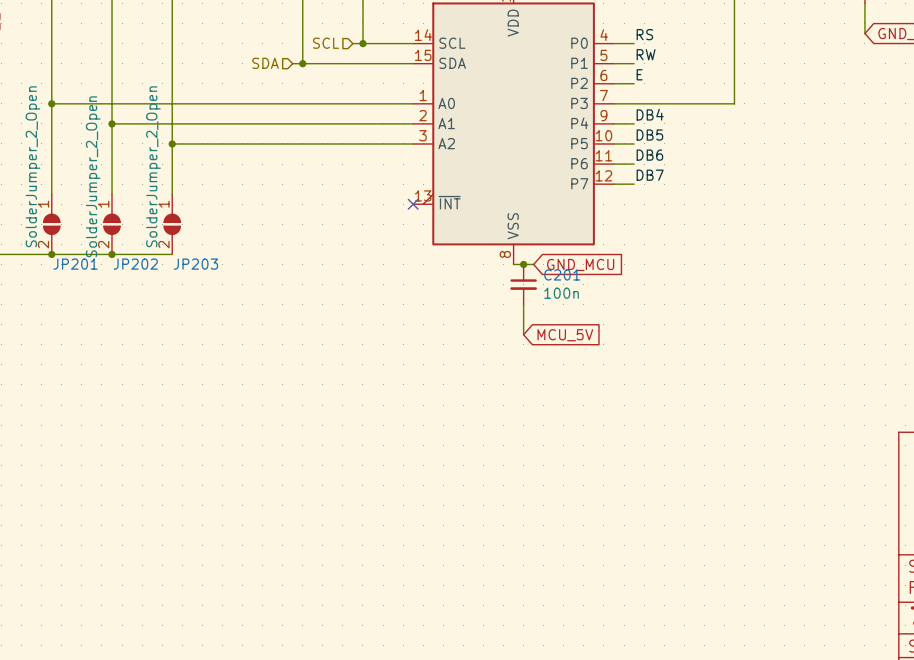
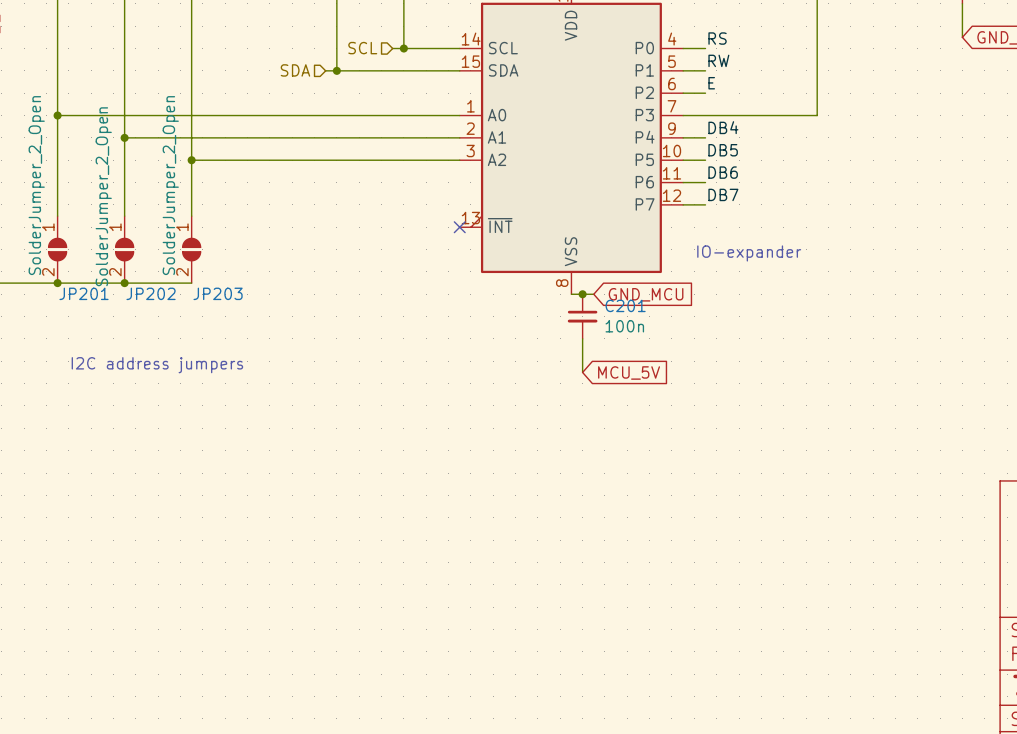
text: none -> IO-expander (749, 253)
text: none -> I2C address jumpers (157, 365)

